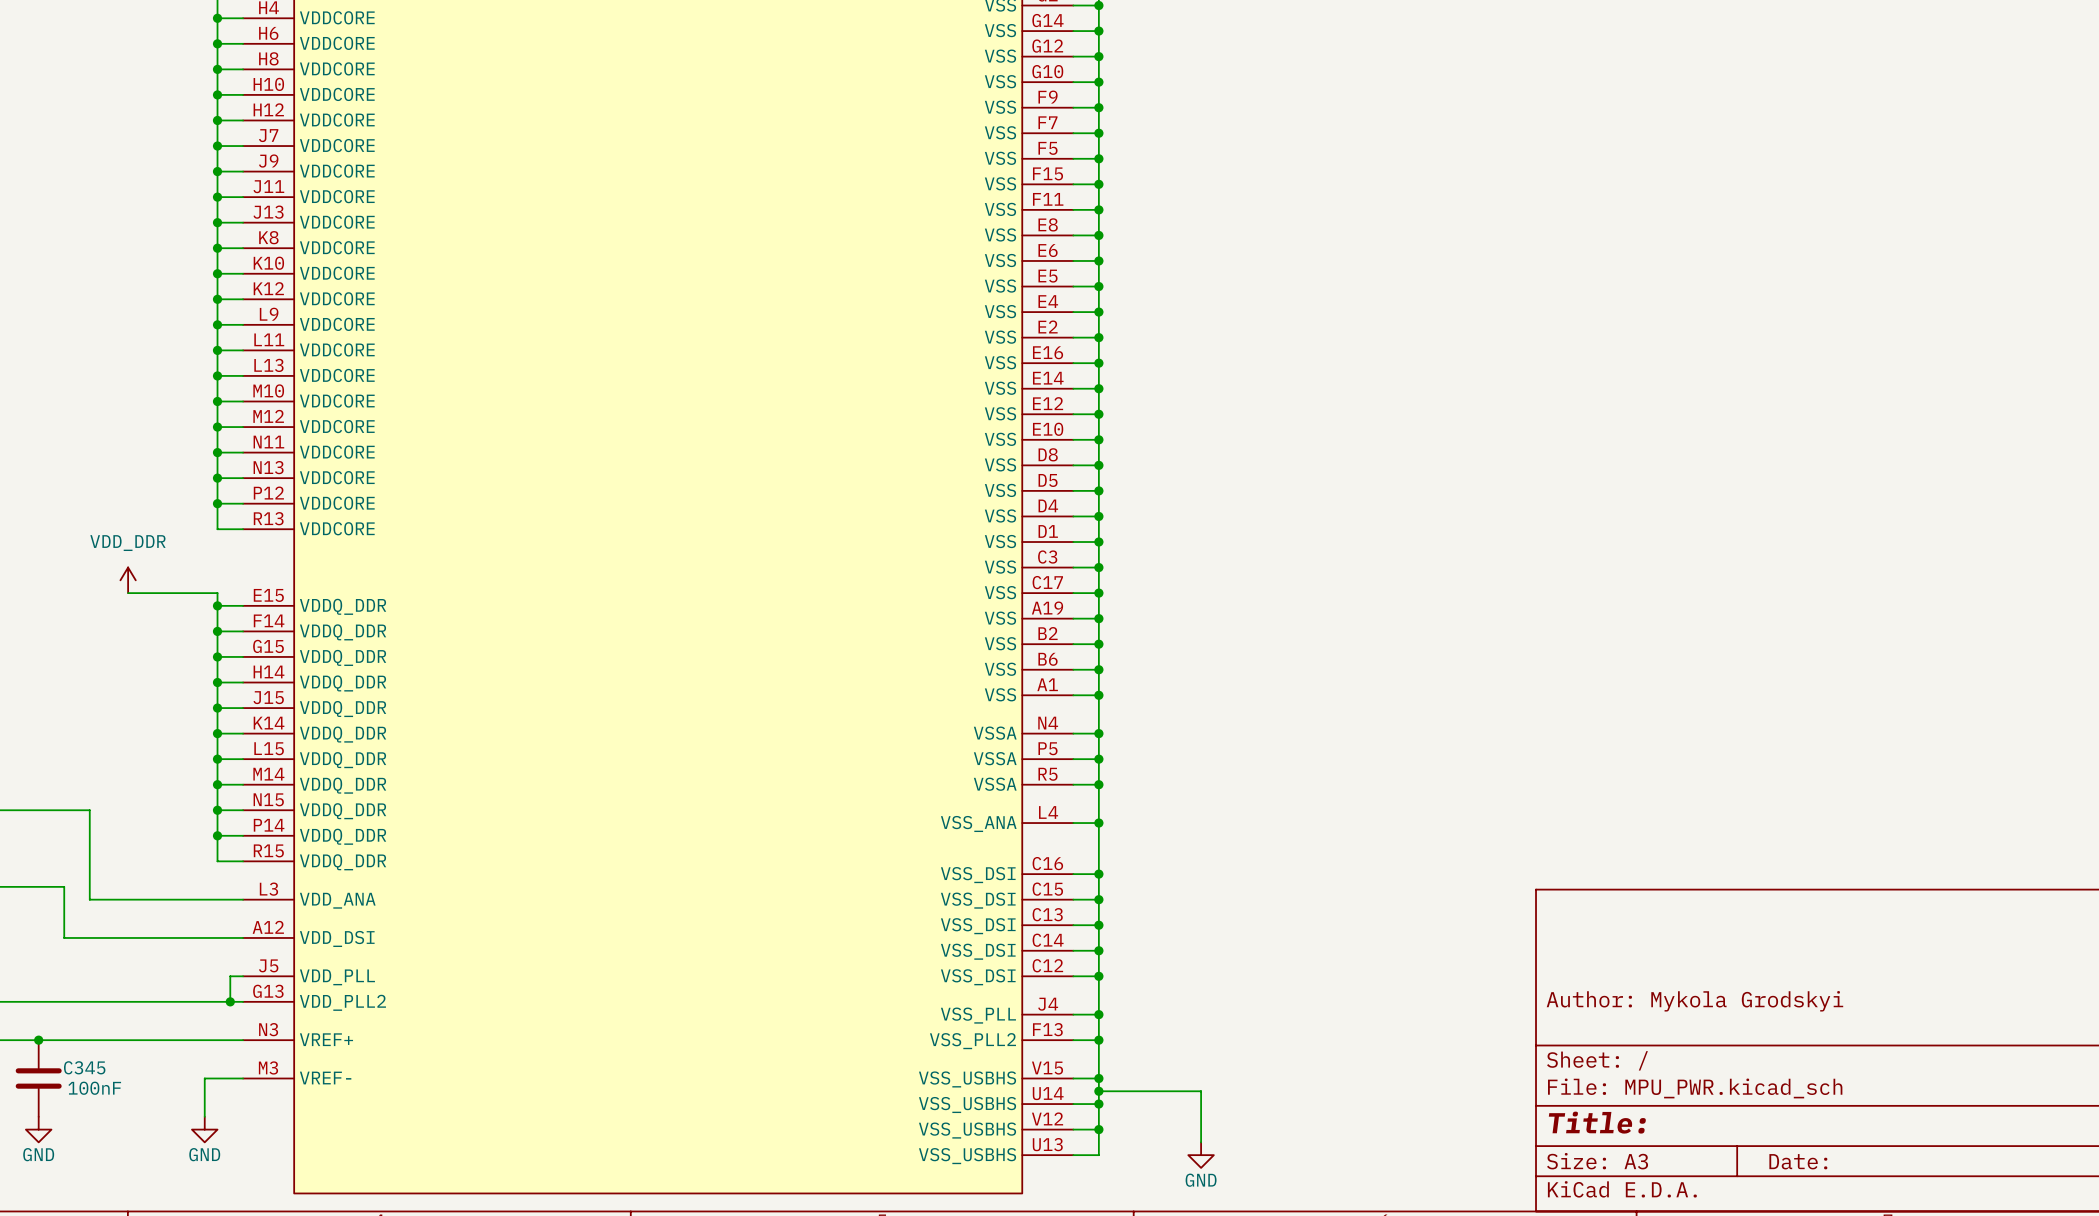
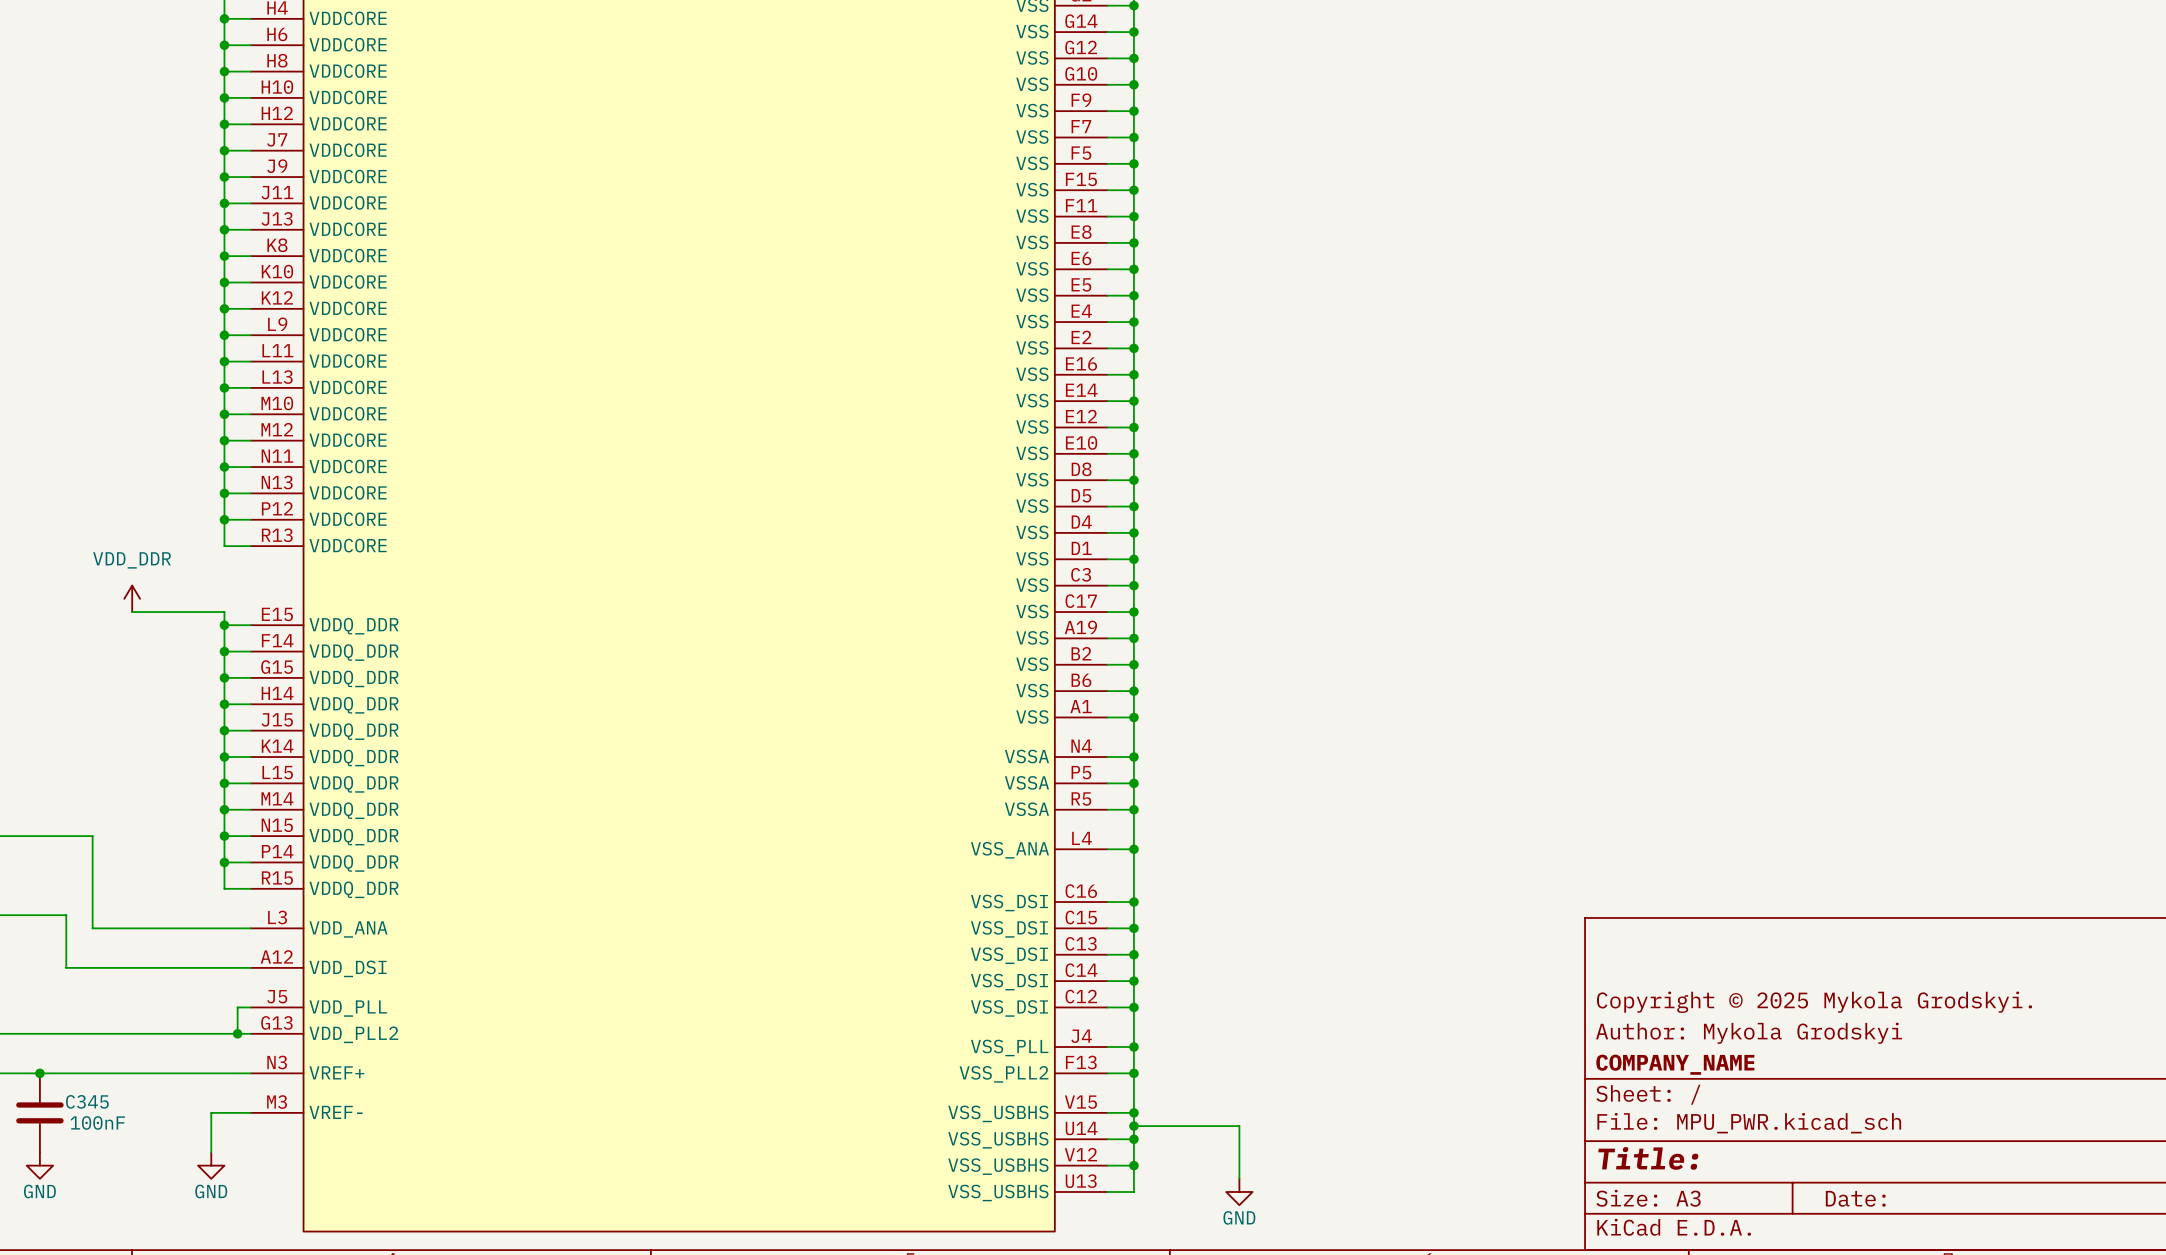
title block: none -> Copyright © 2025 Mykola Grodskyi. (1814, 1002)
title block: none -> COMPANY_NAME (1675, 1064)

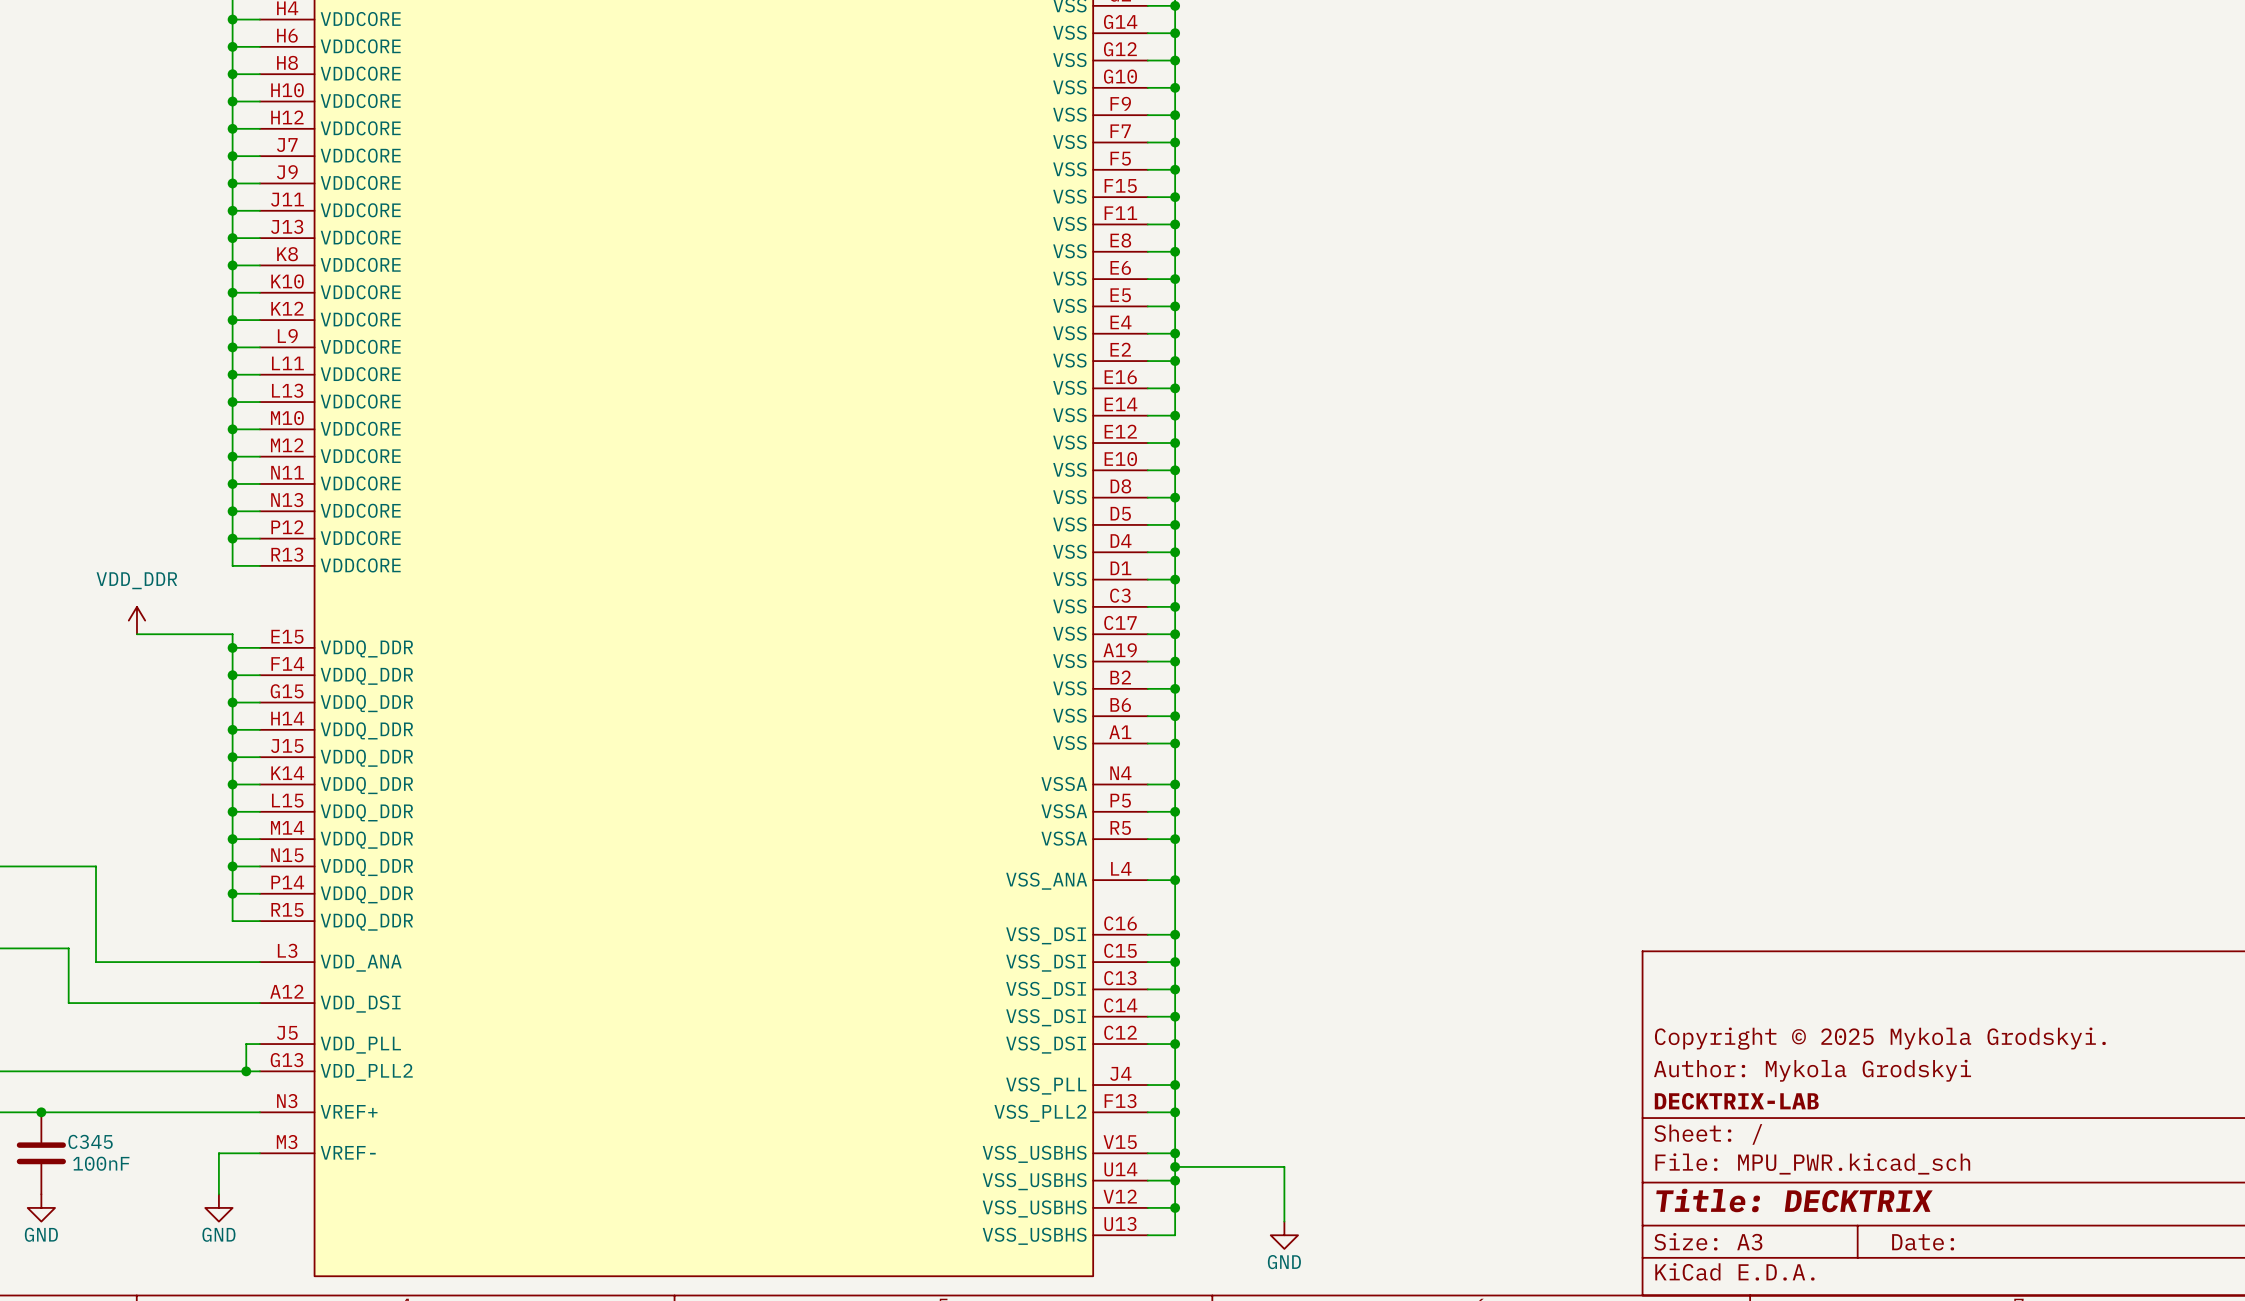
title block: COMPANY_NAME (1675, 1064) -> DECKTRIX-LAB (1736, 1101)
title block: Title: (1648, 1158) -> Title: DECKTRIX (1794, 1200)

